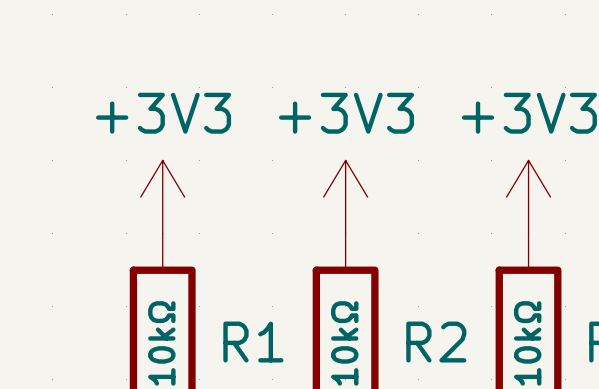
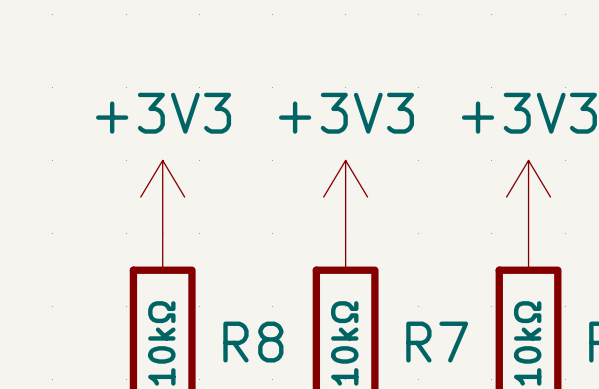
R1 name: R1 (253, 342) -> R8 (253, 342)
R2 name: R2 (436, 342) -> R7 (437, 342)

